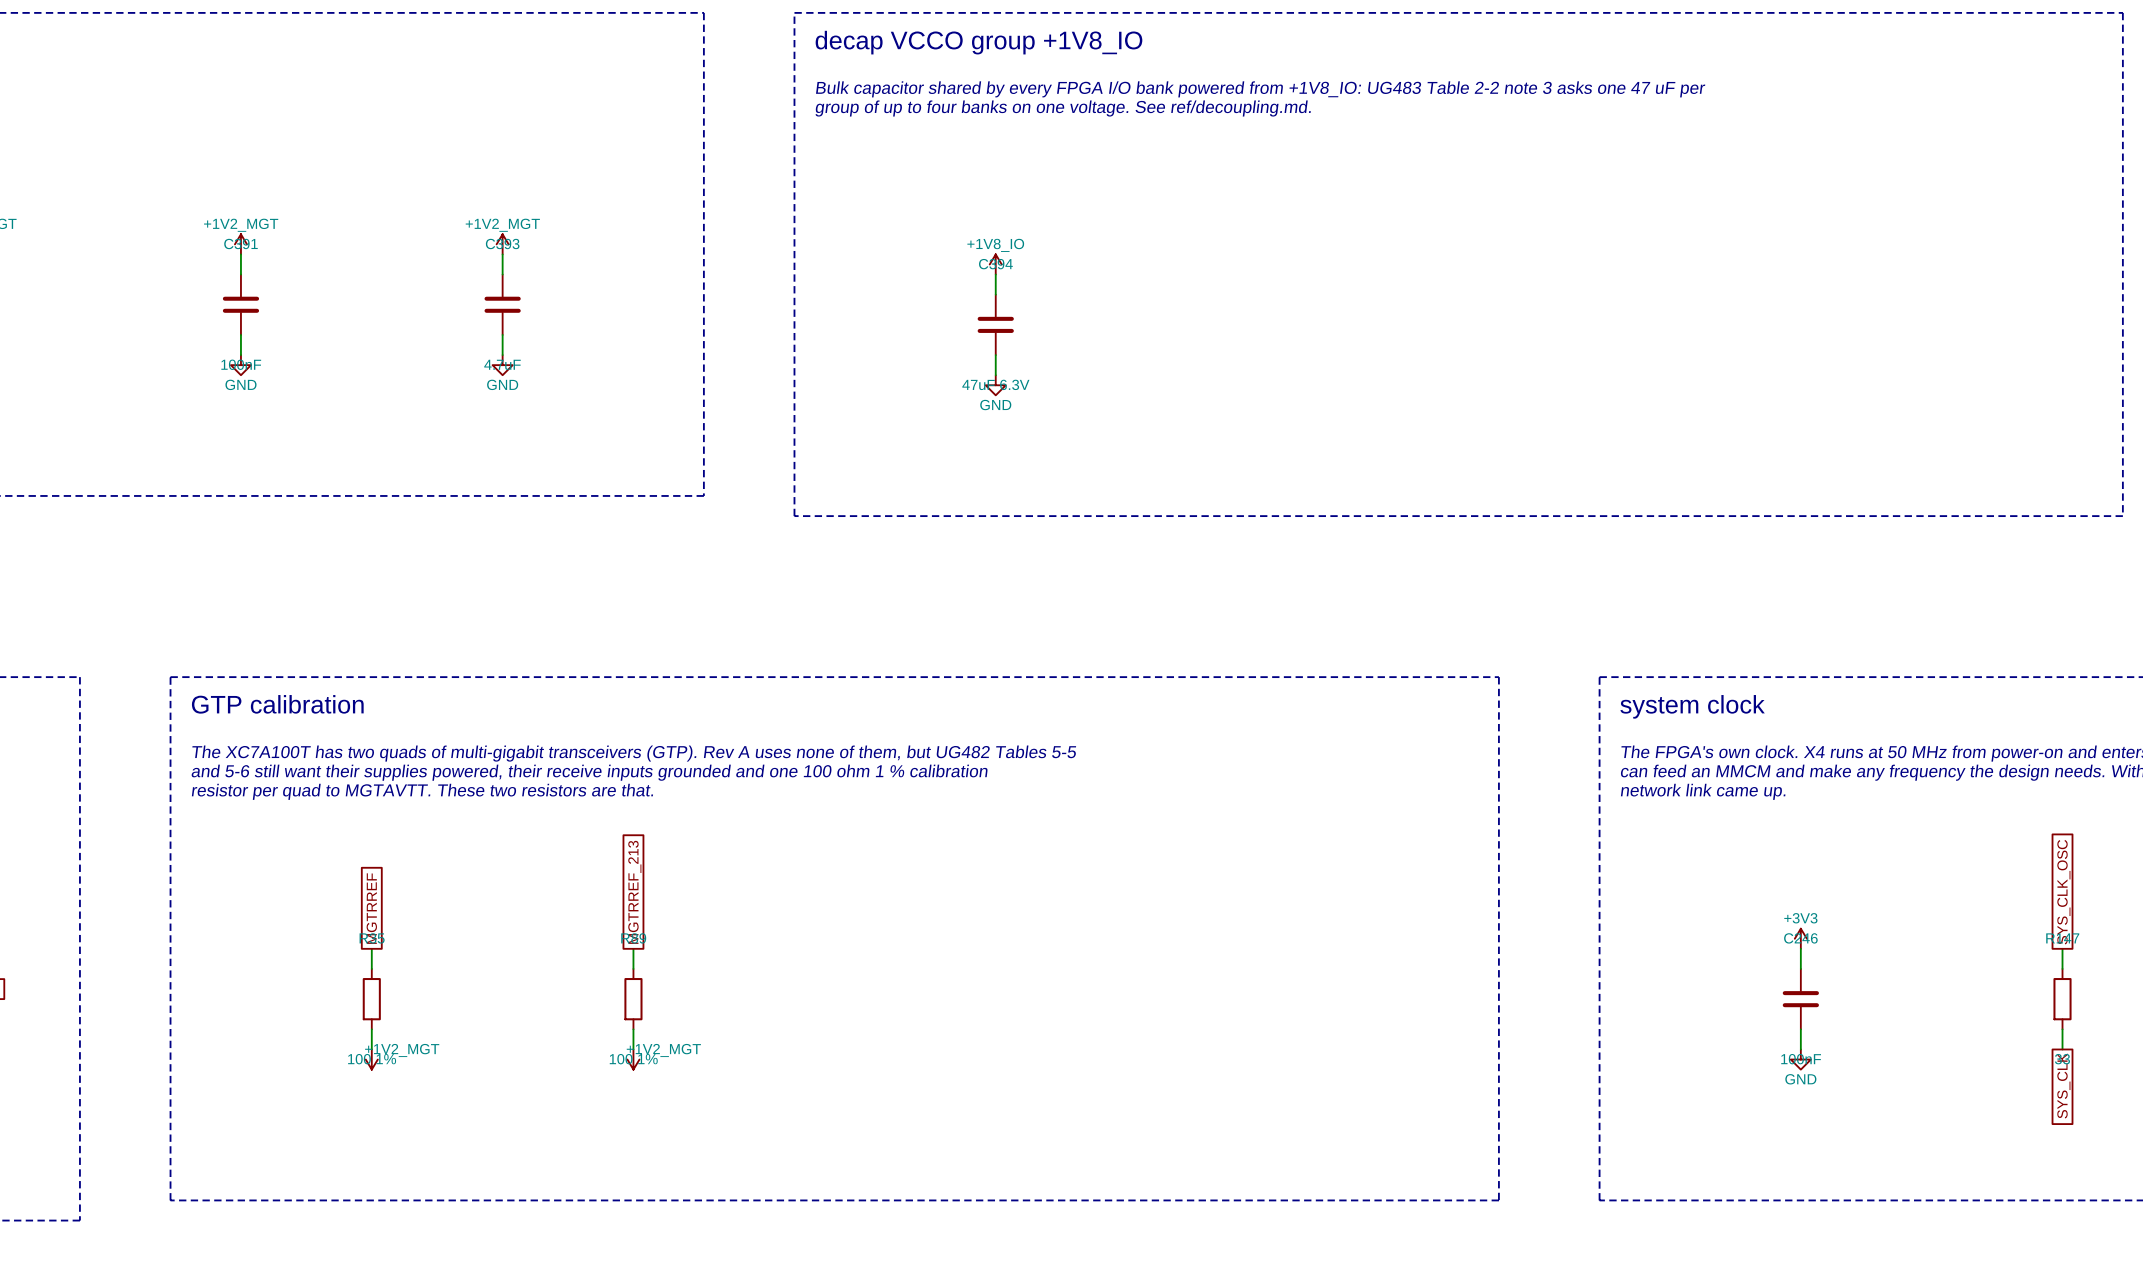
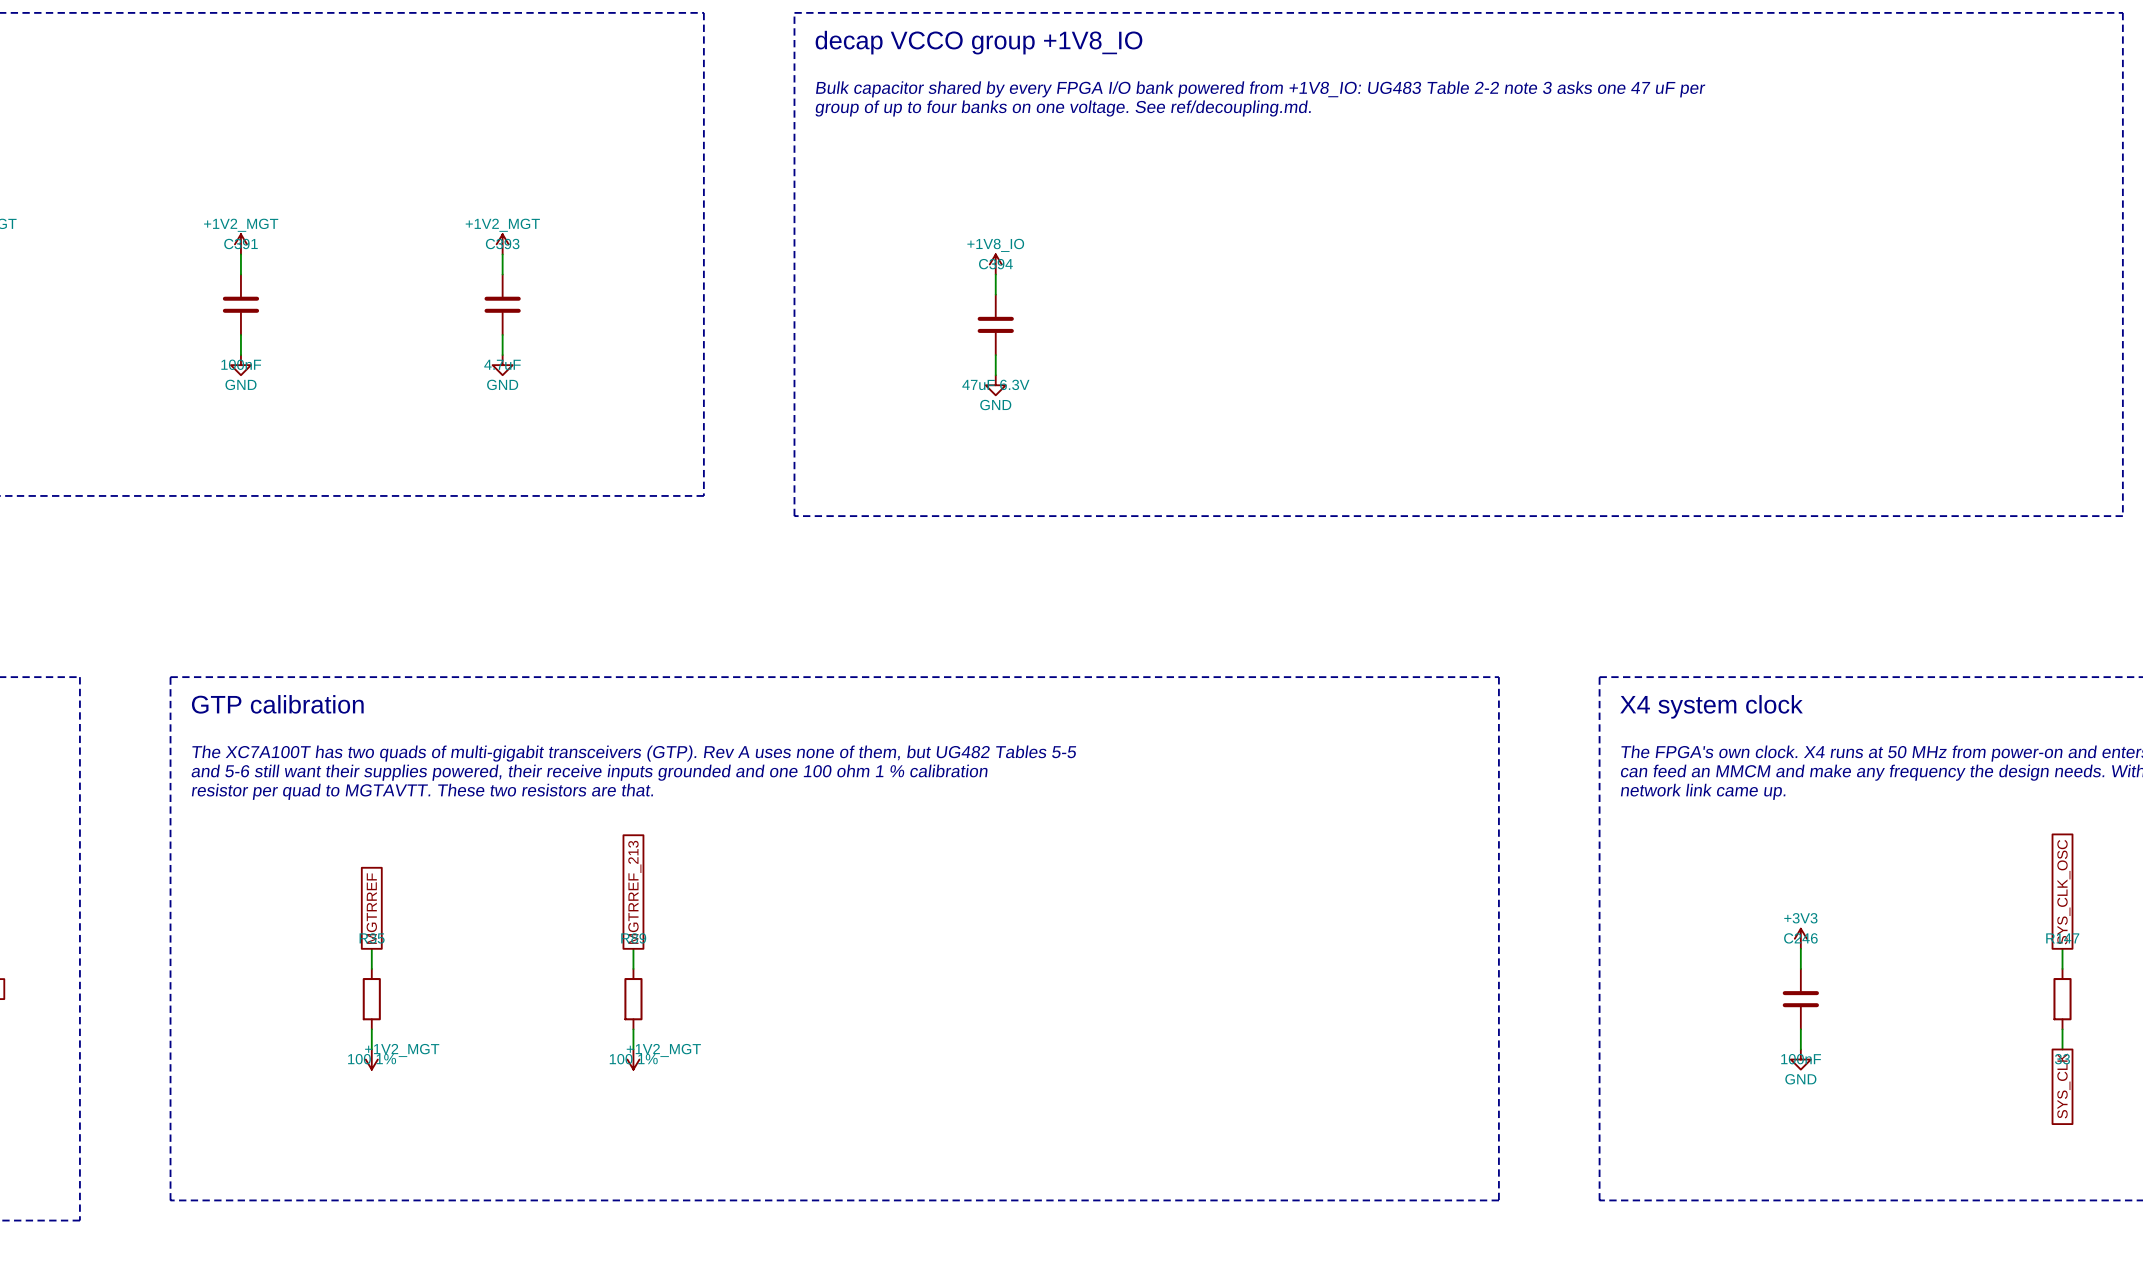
text: system clock (1692, 706) -> X4 system clock (1711, 706)

